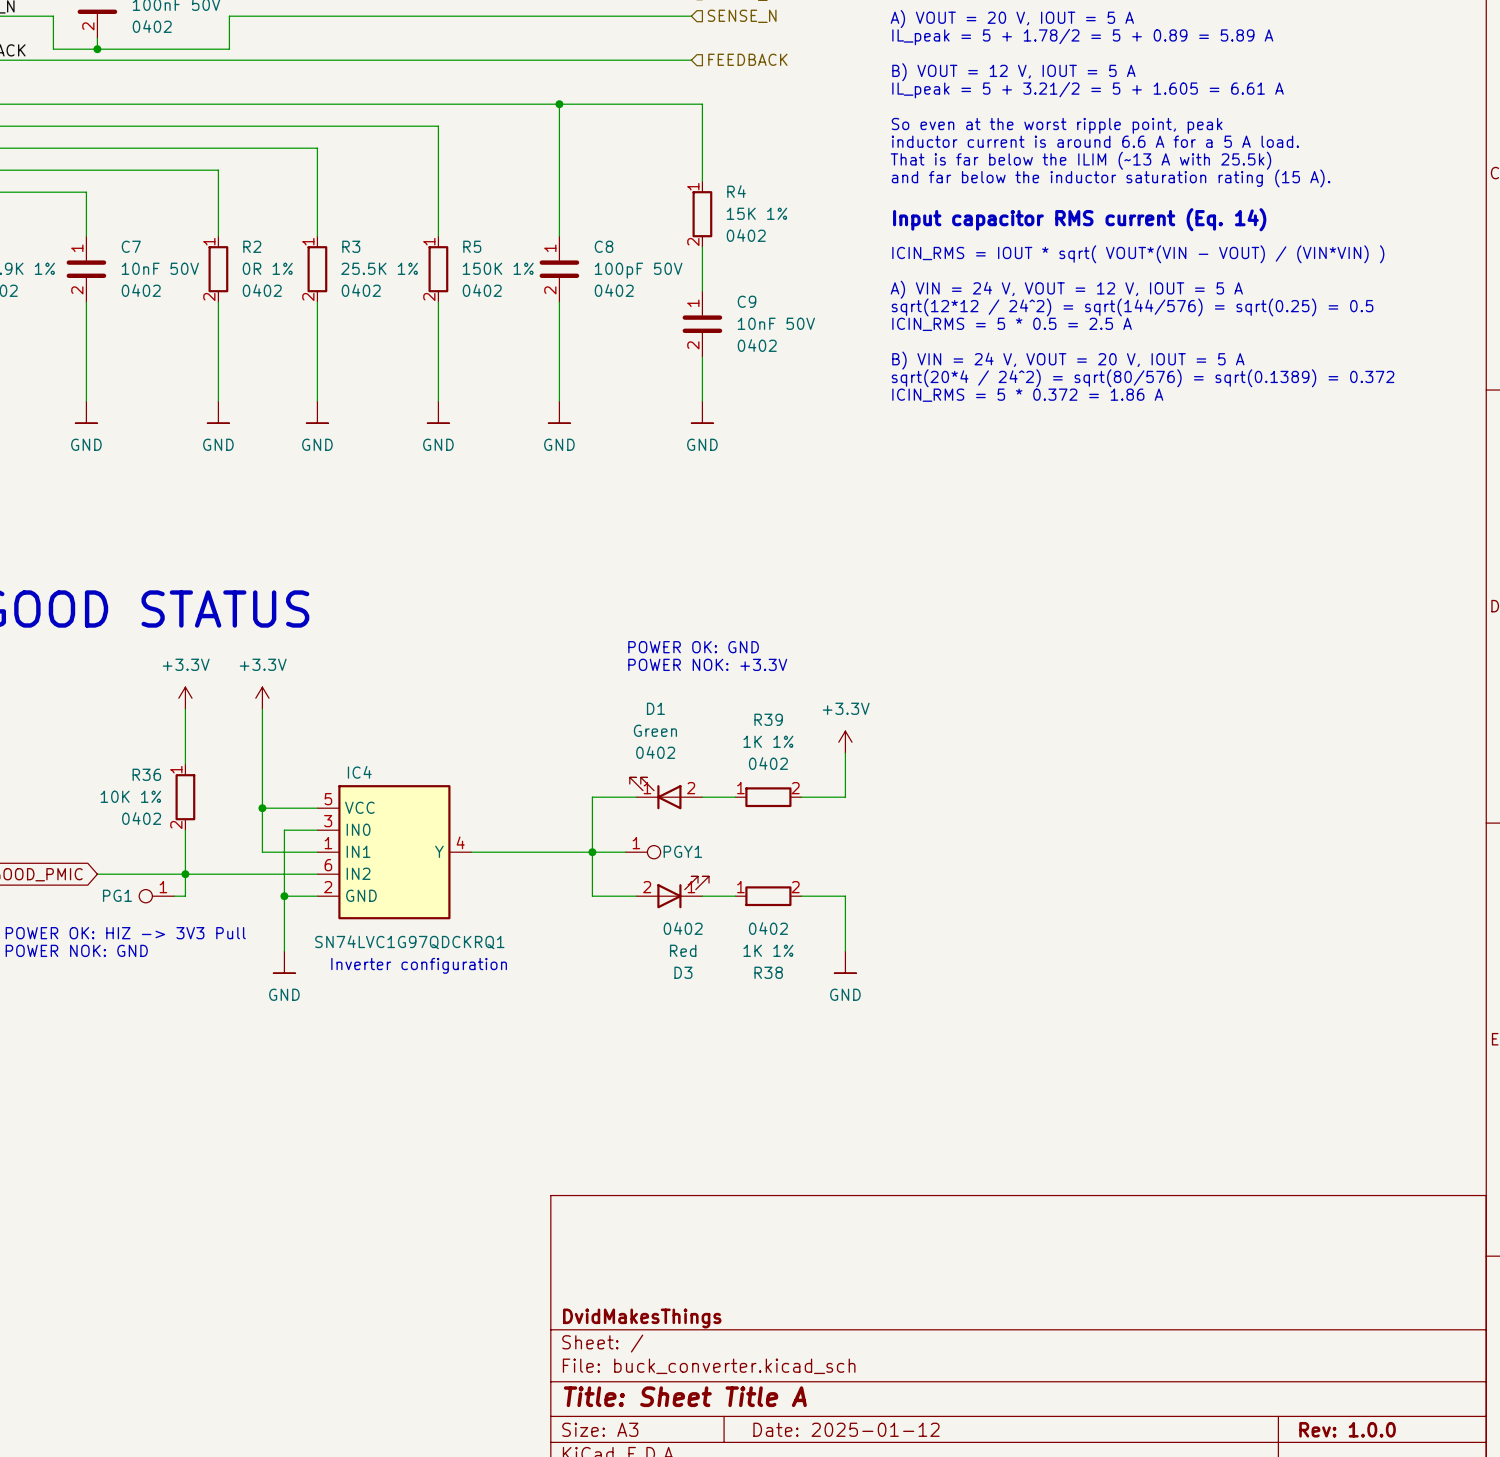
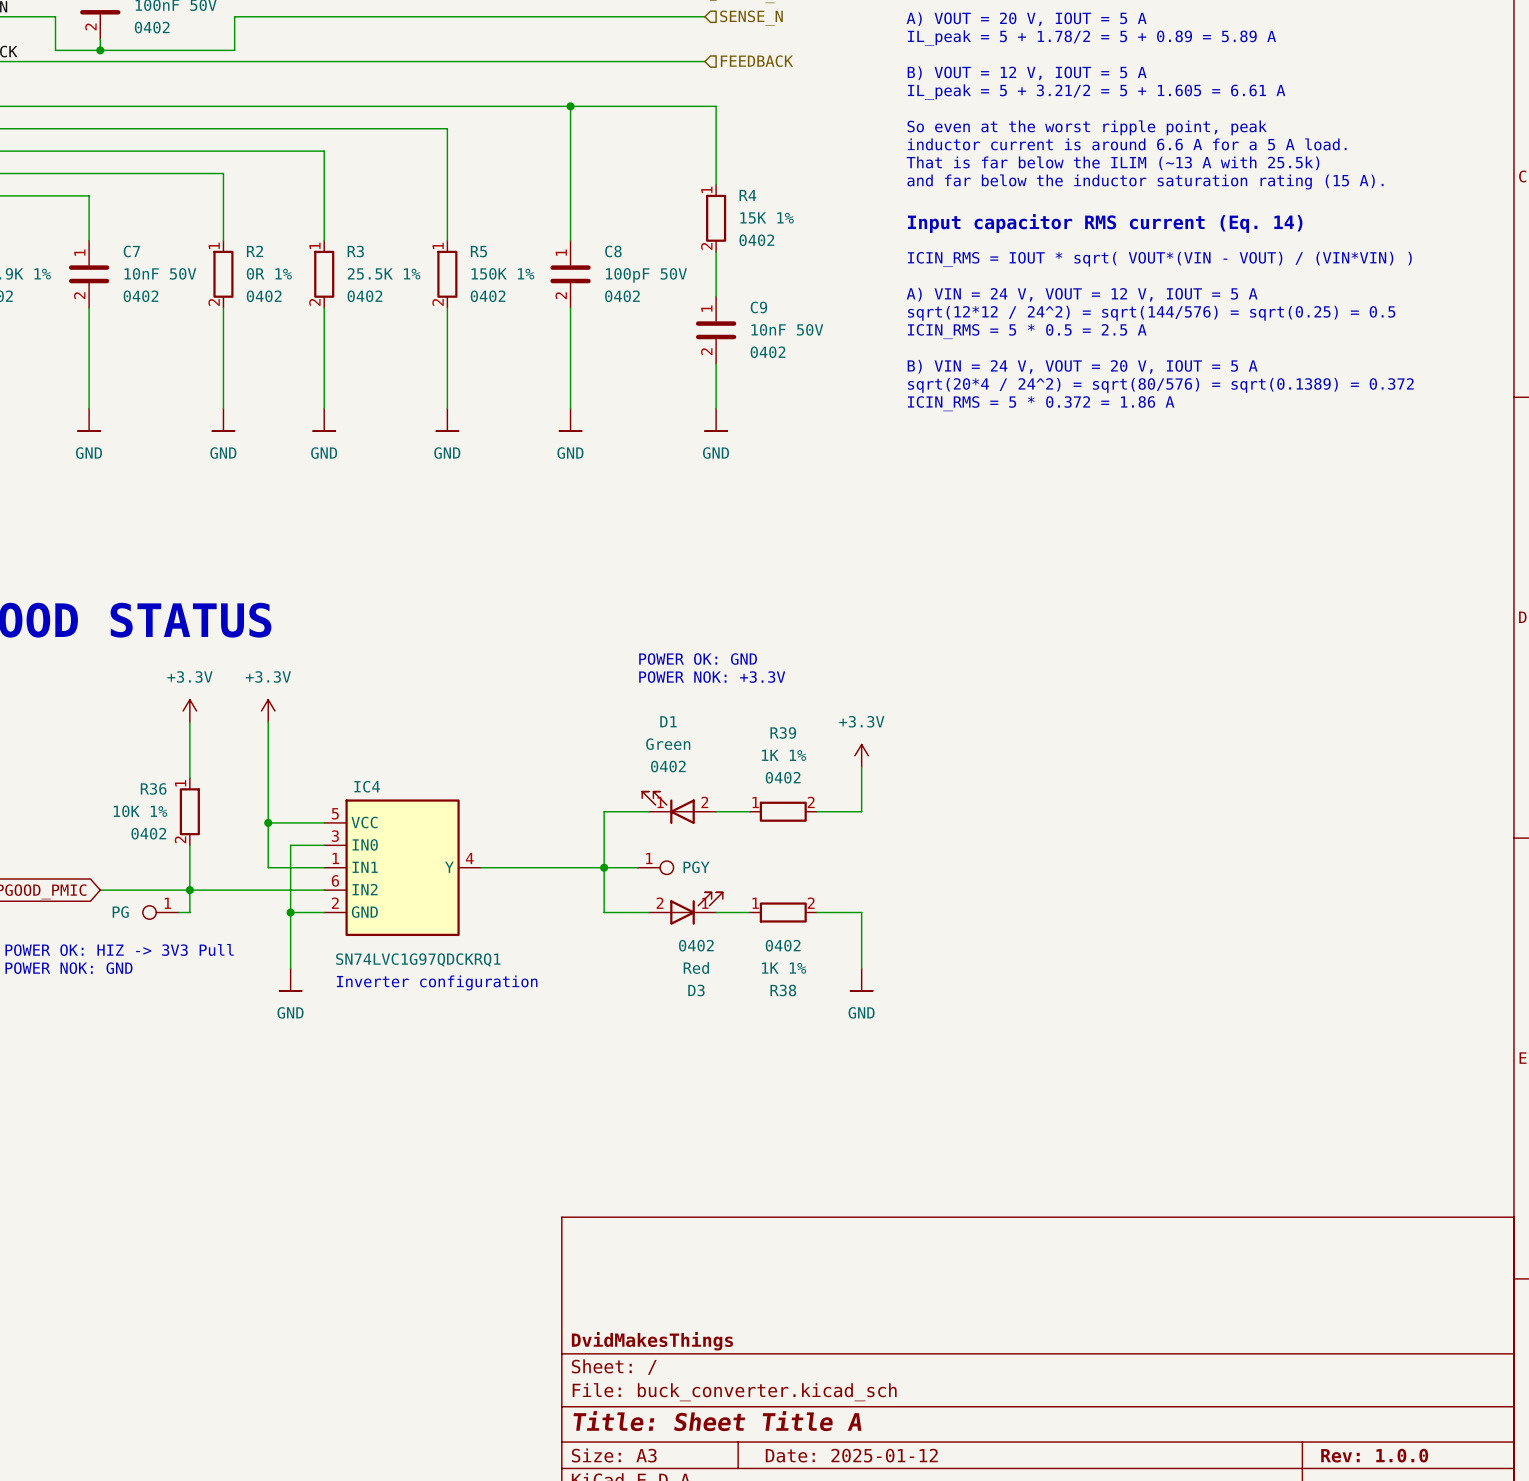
PGY1 name: PGY1 (682, 851) -> PGY (696, 867)
PG1 name: PG1 (117, 895) -> PG (120, 912)

